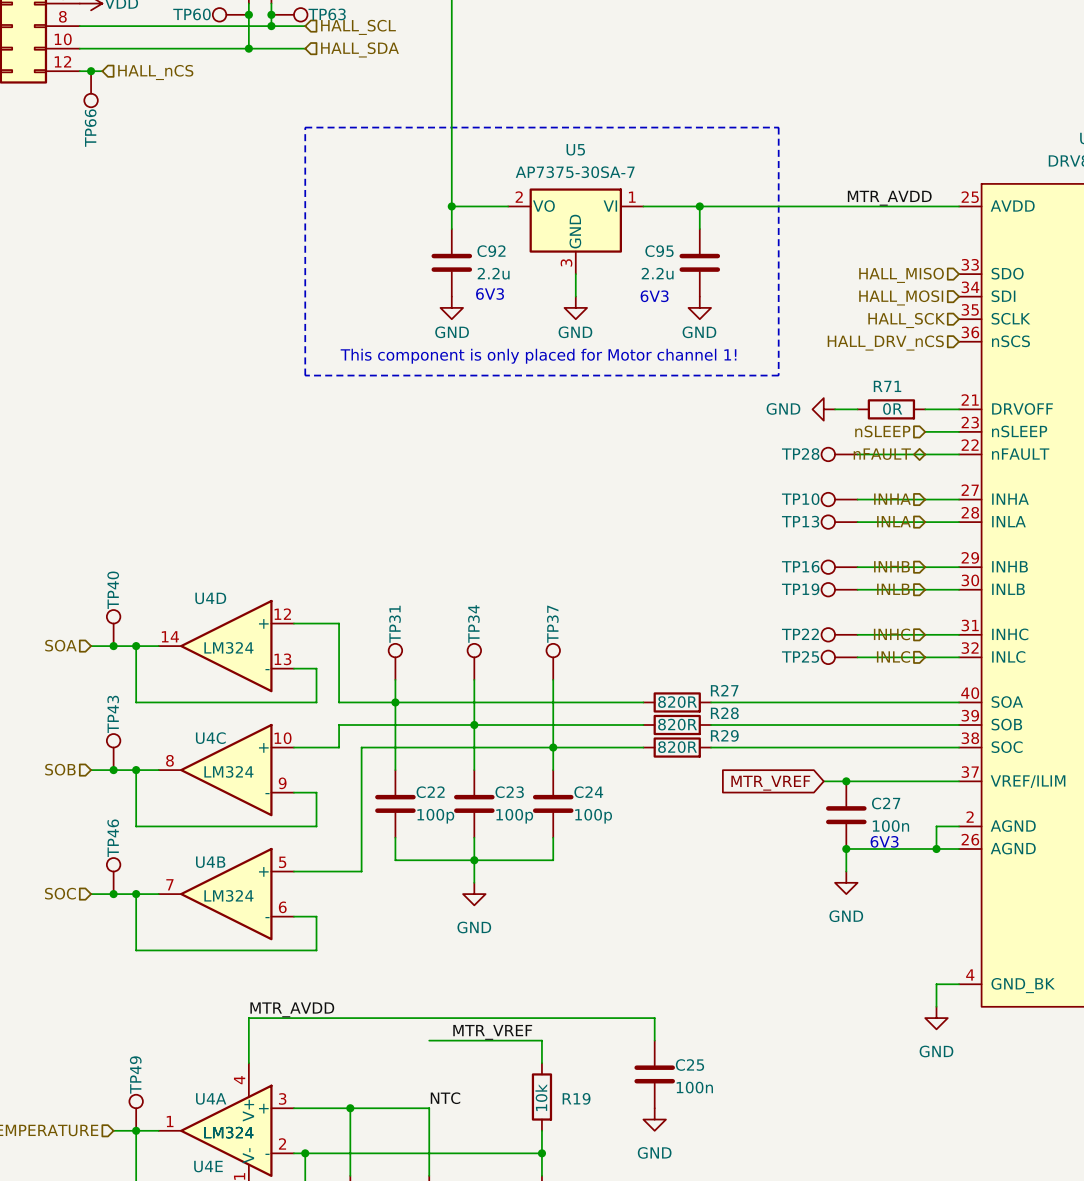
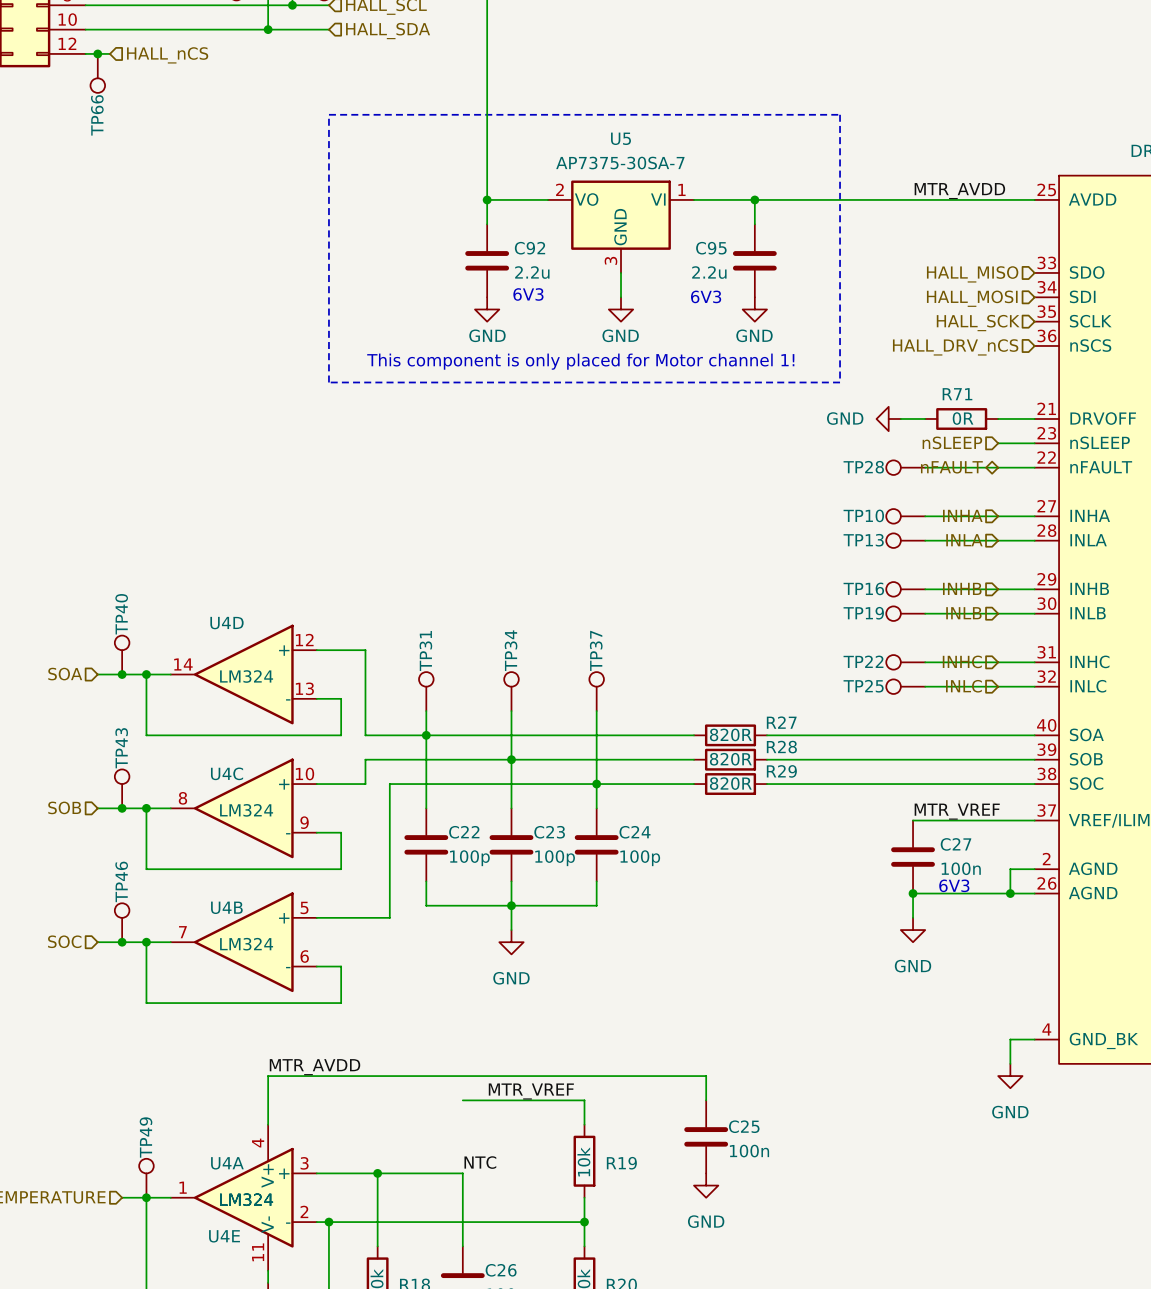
label: none -> MTR_VREF (957, 811)
wire: (823, 781) (846, 781) -> none
junction: (846, 781) -> none
global label: MTR_VREF (770, 783) -> none

